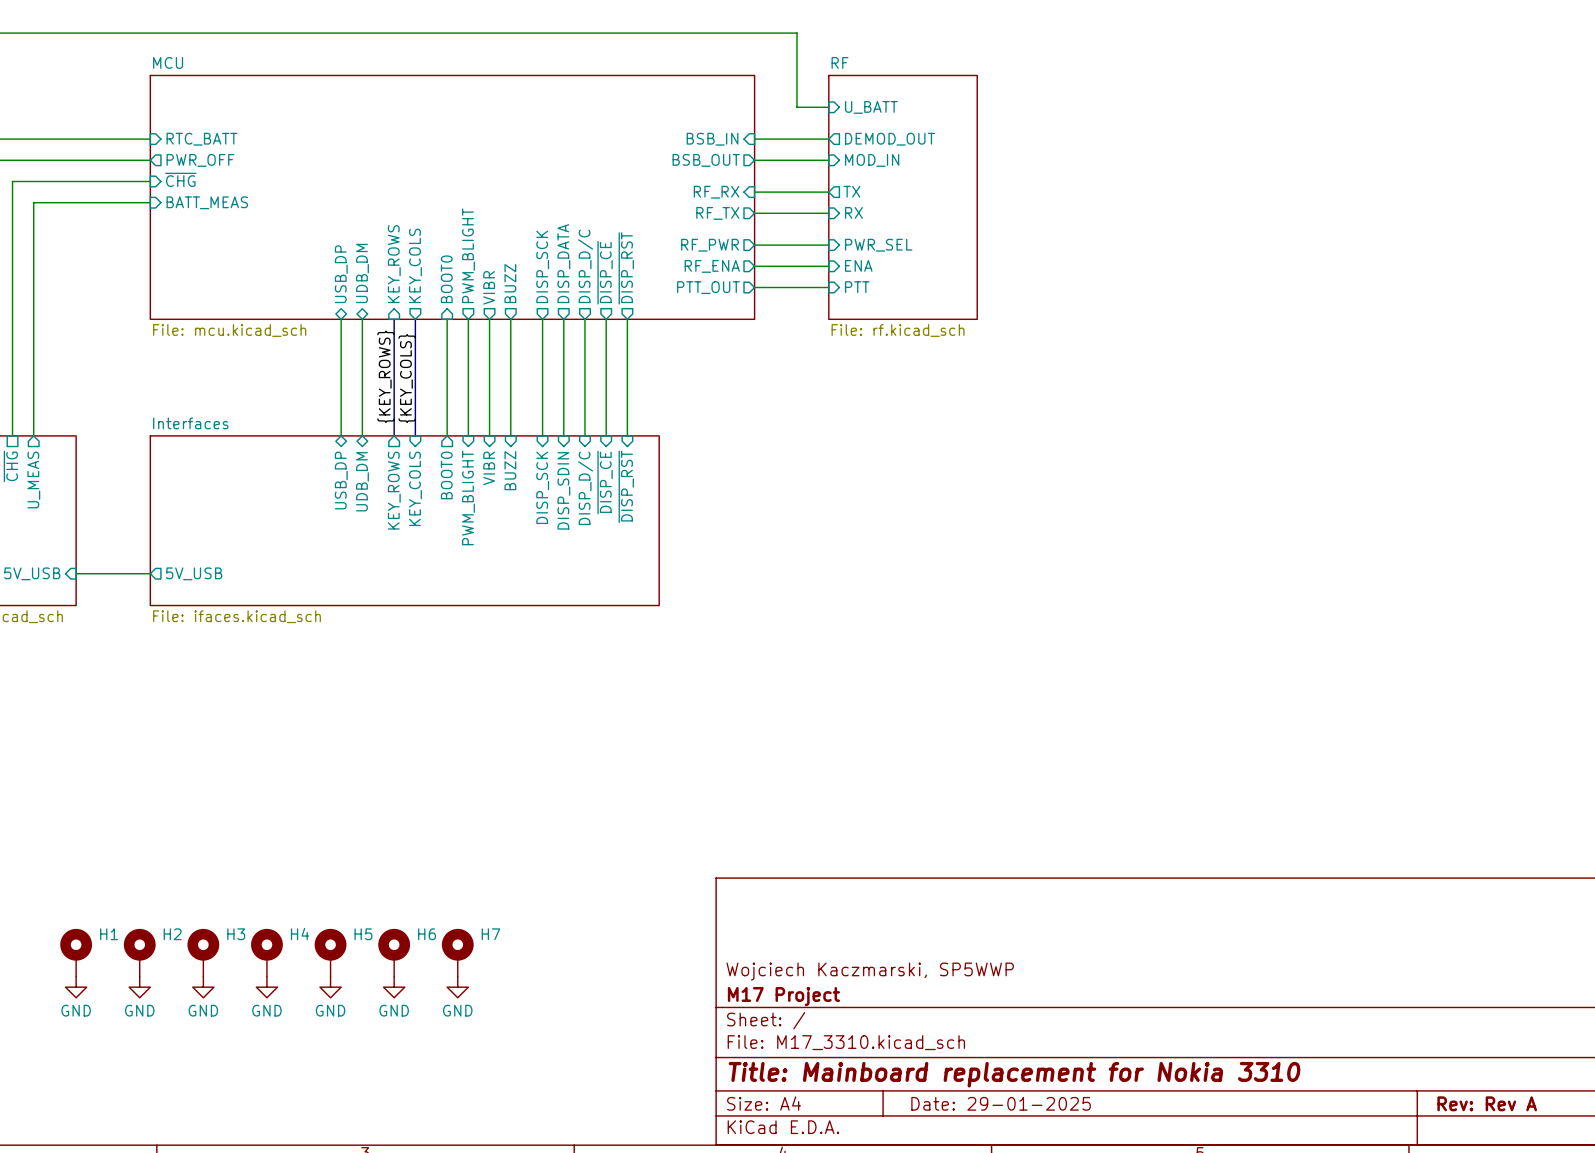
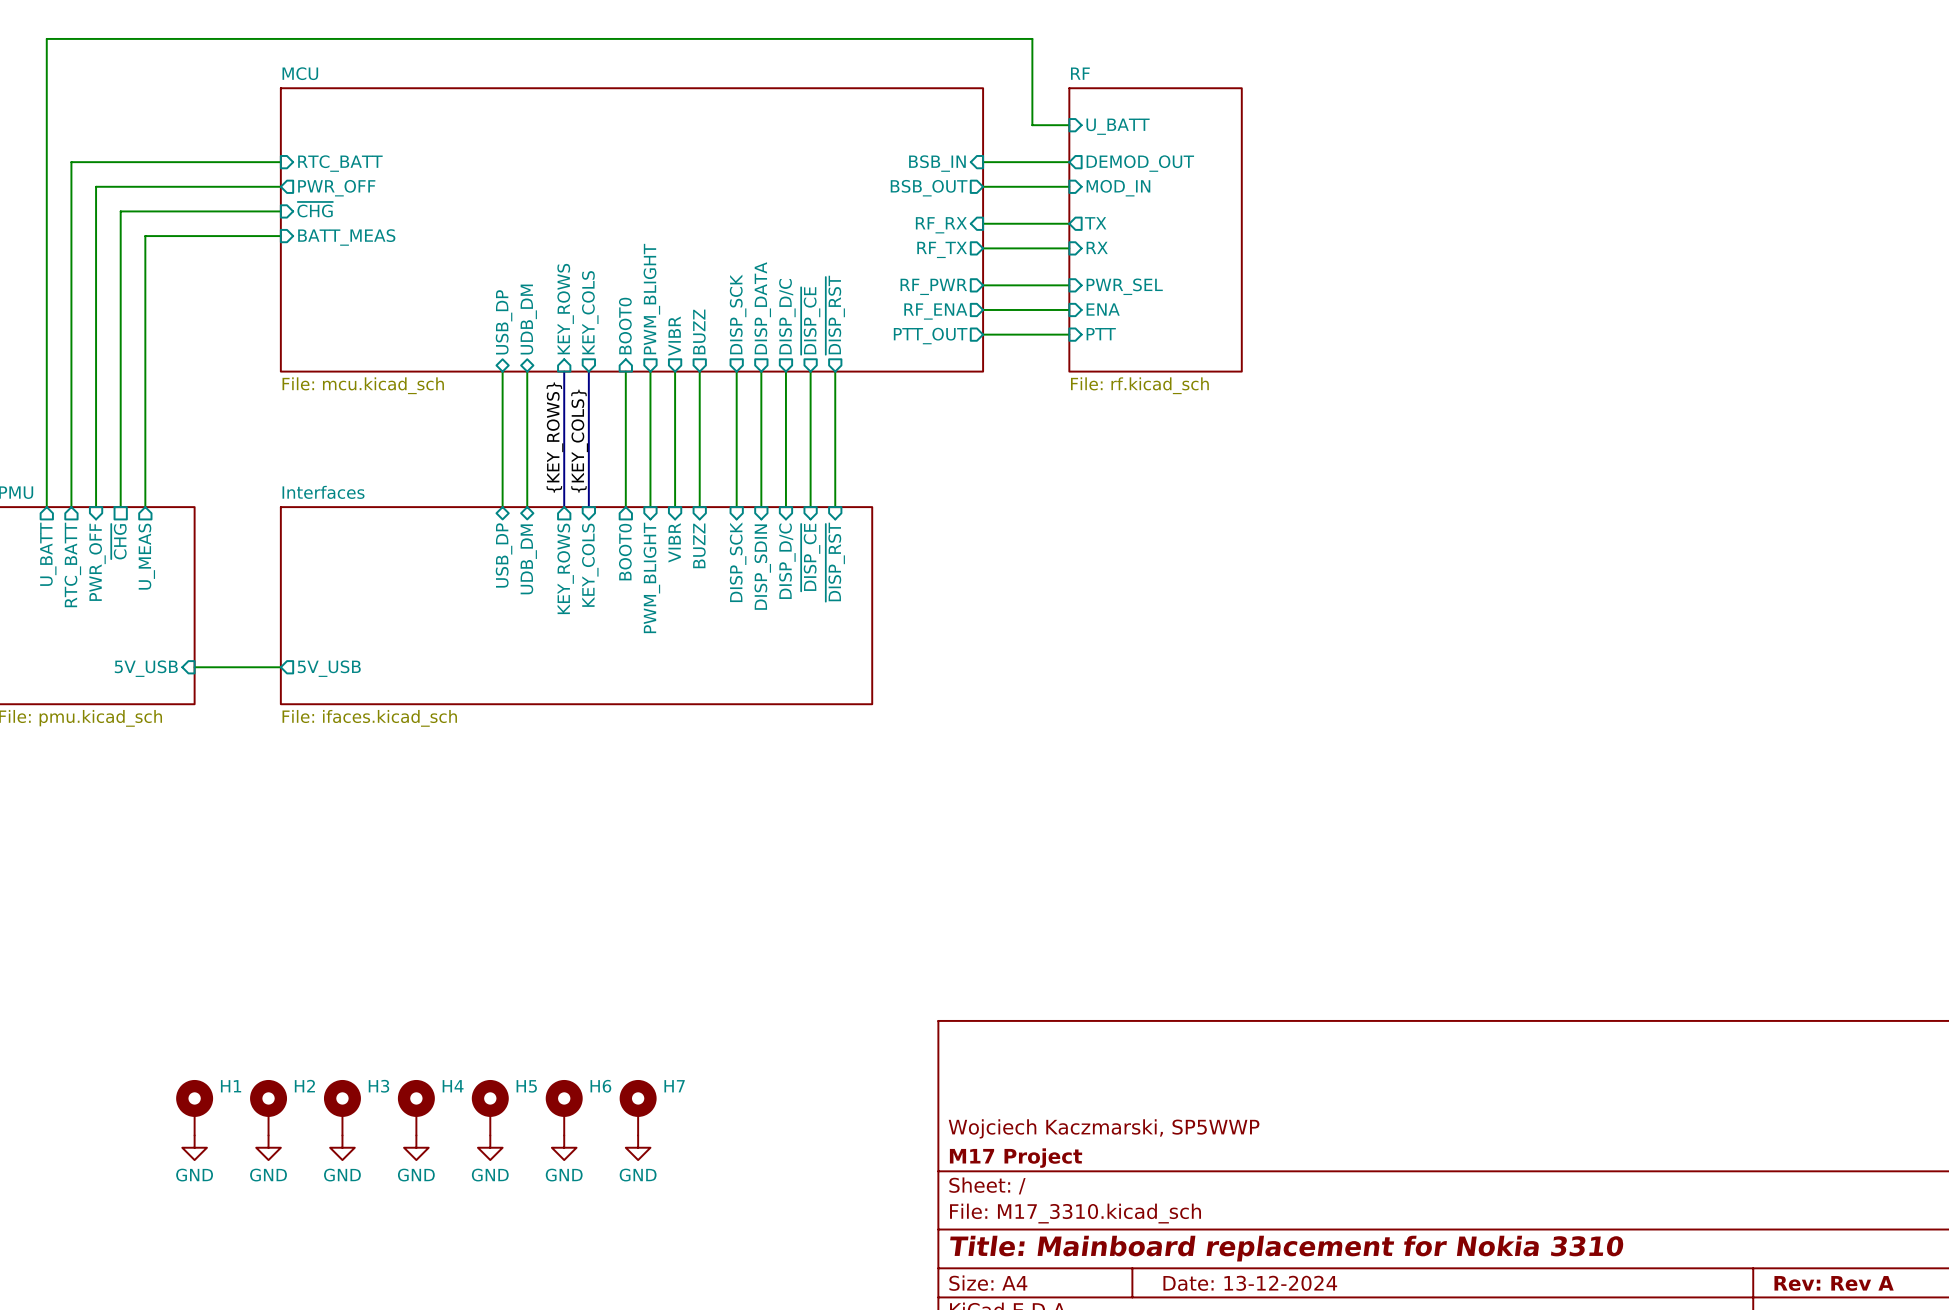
title block: Date: 29-01-2025 (1001, 1103) -> Date: 13-12-2024 (1250, 1283)

